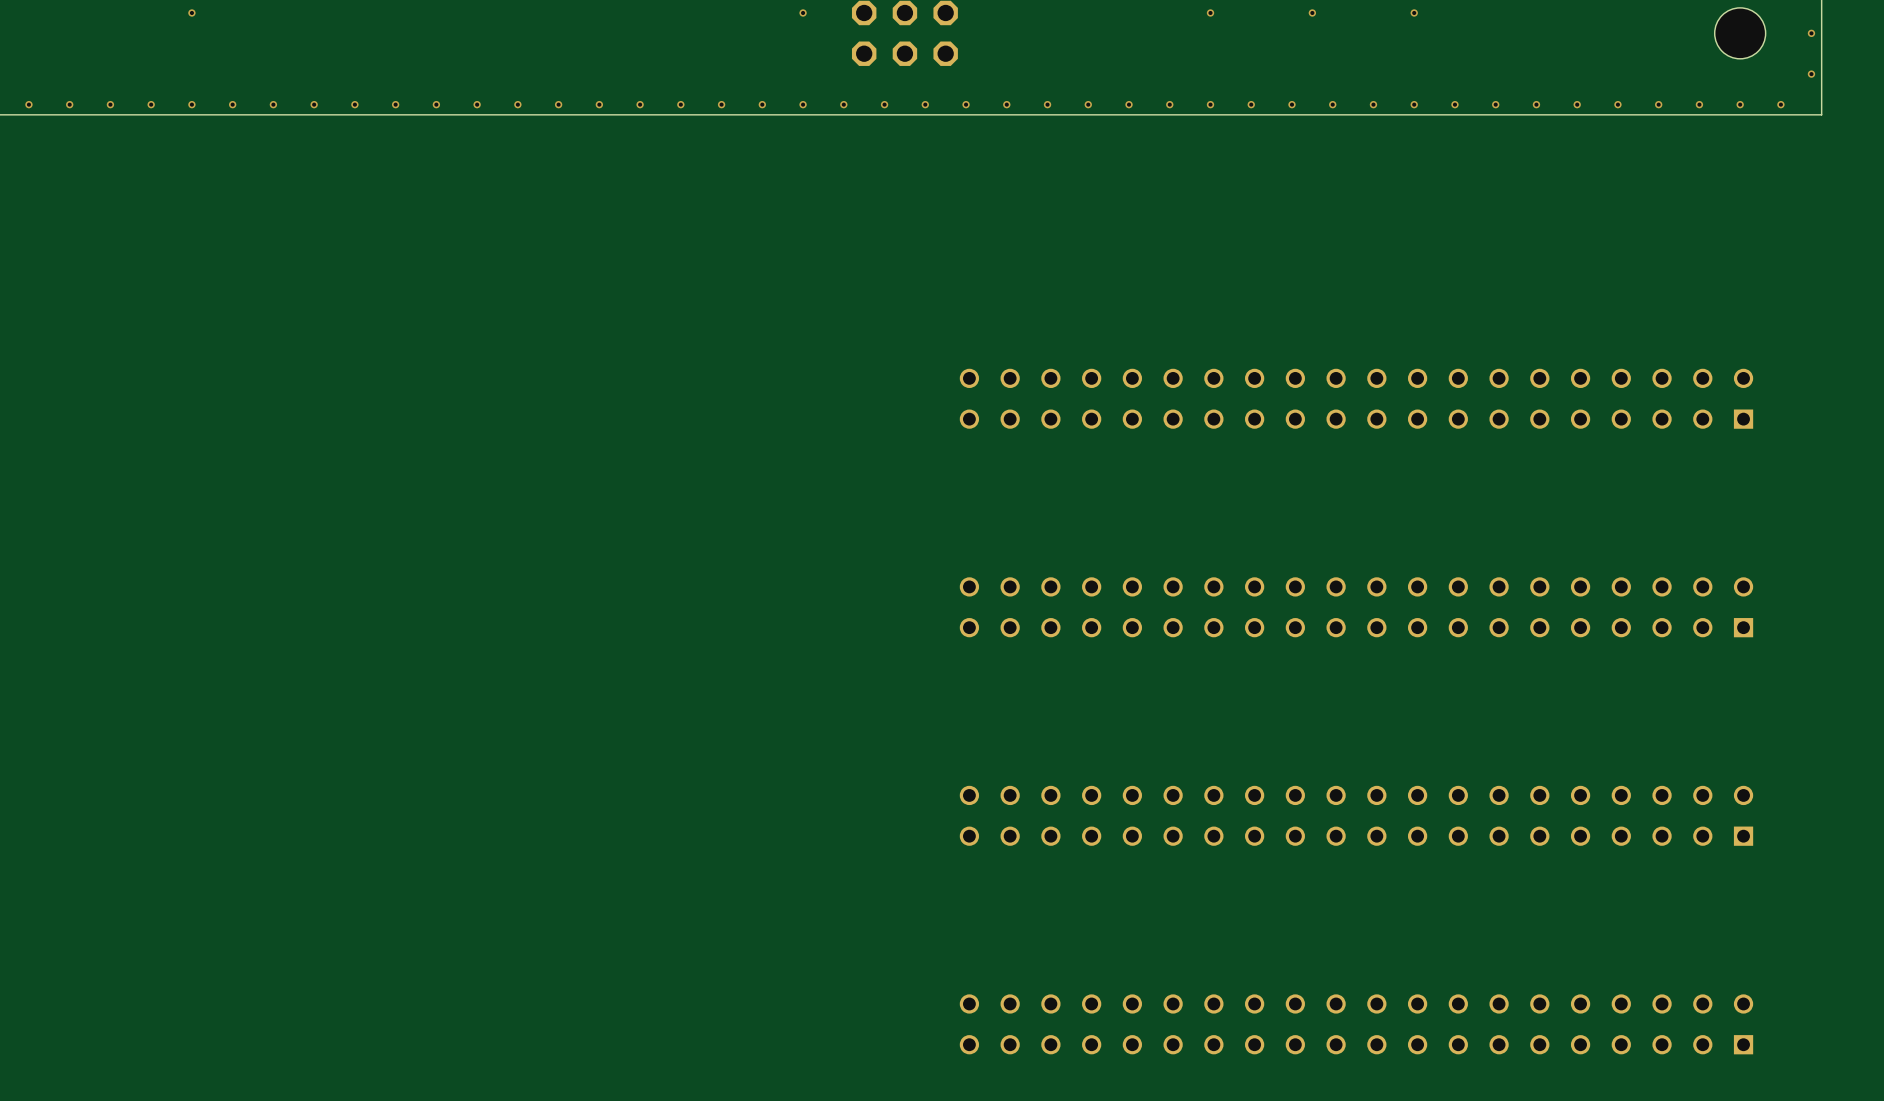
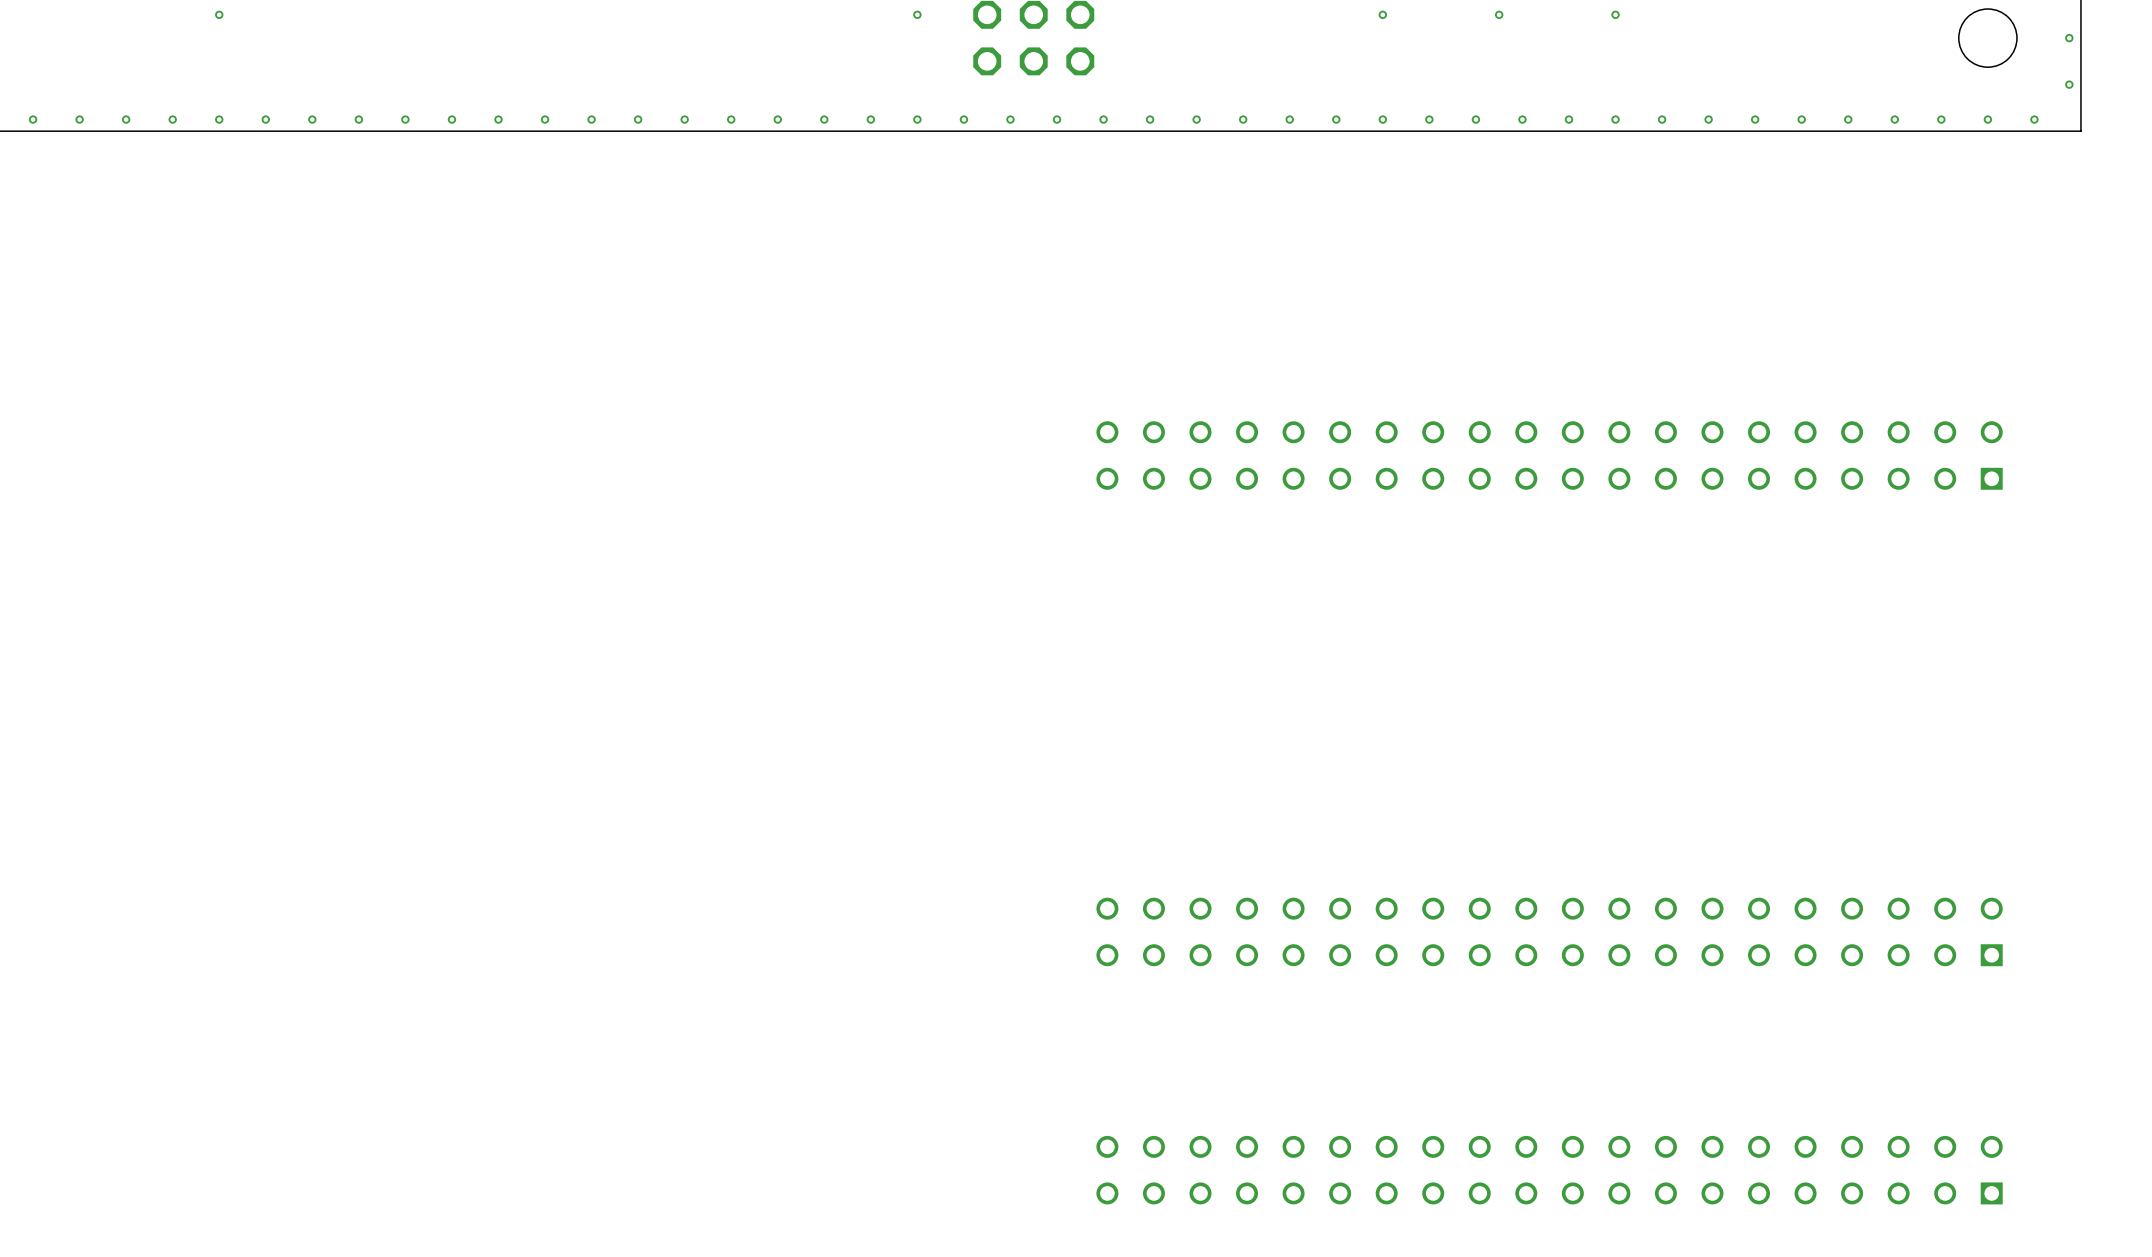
part: (1356, 607) -> none

